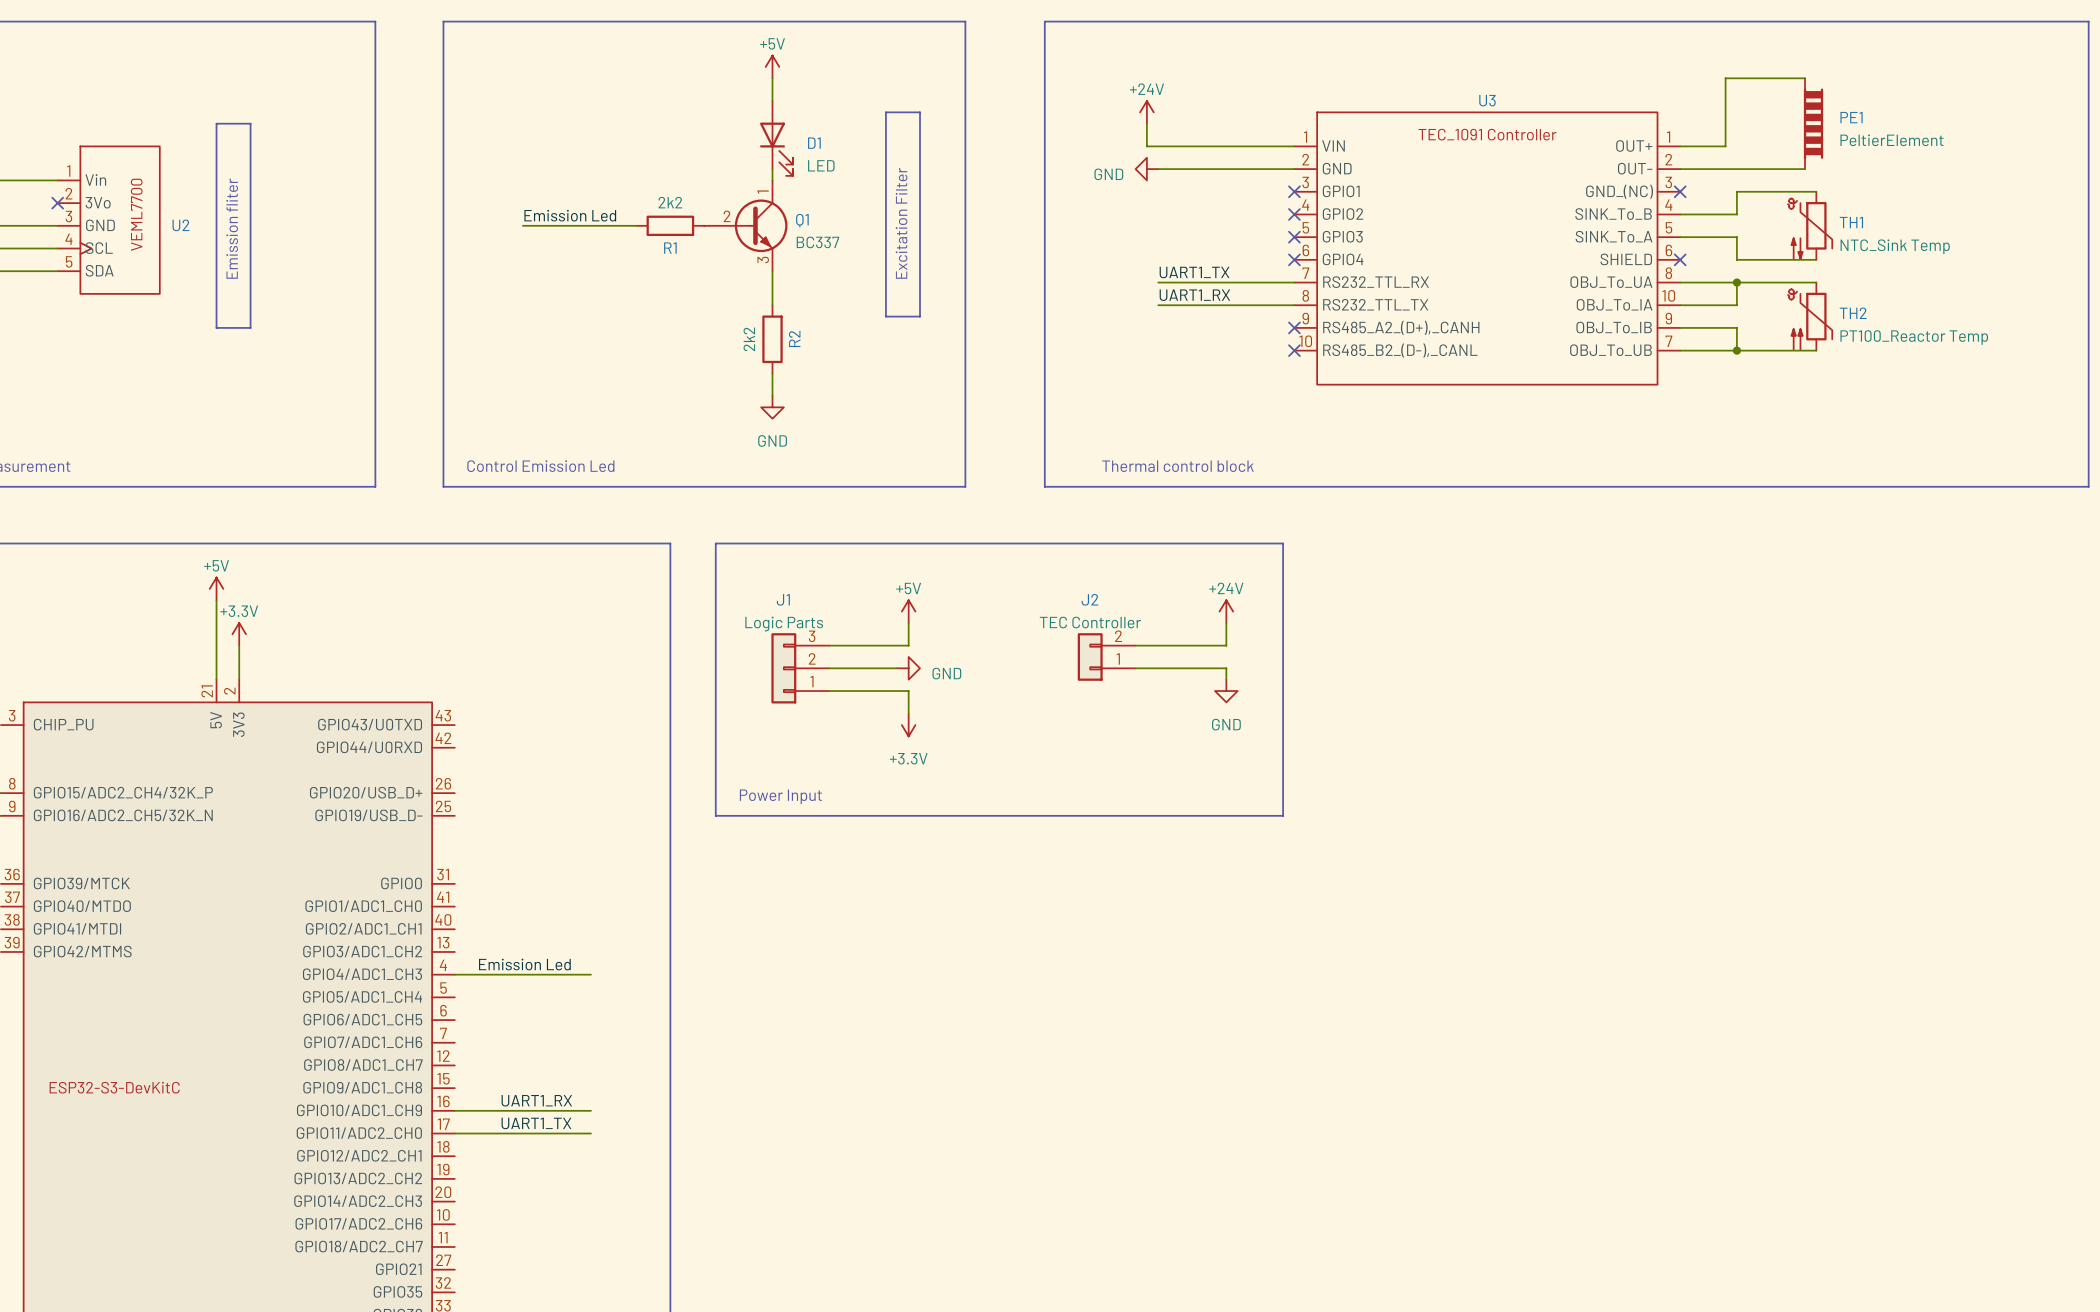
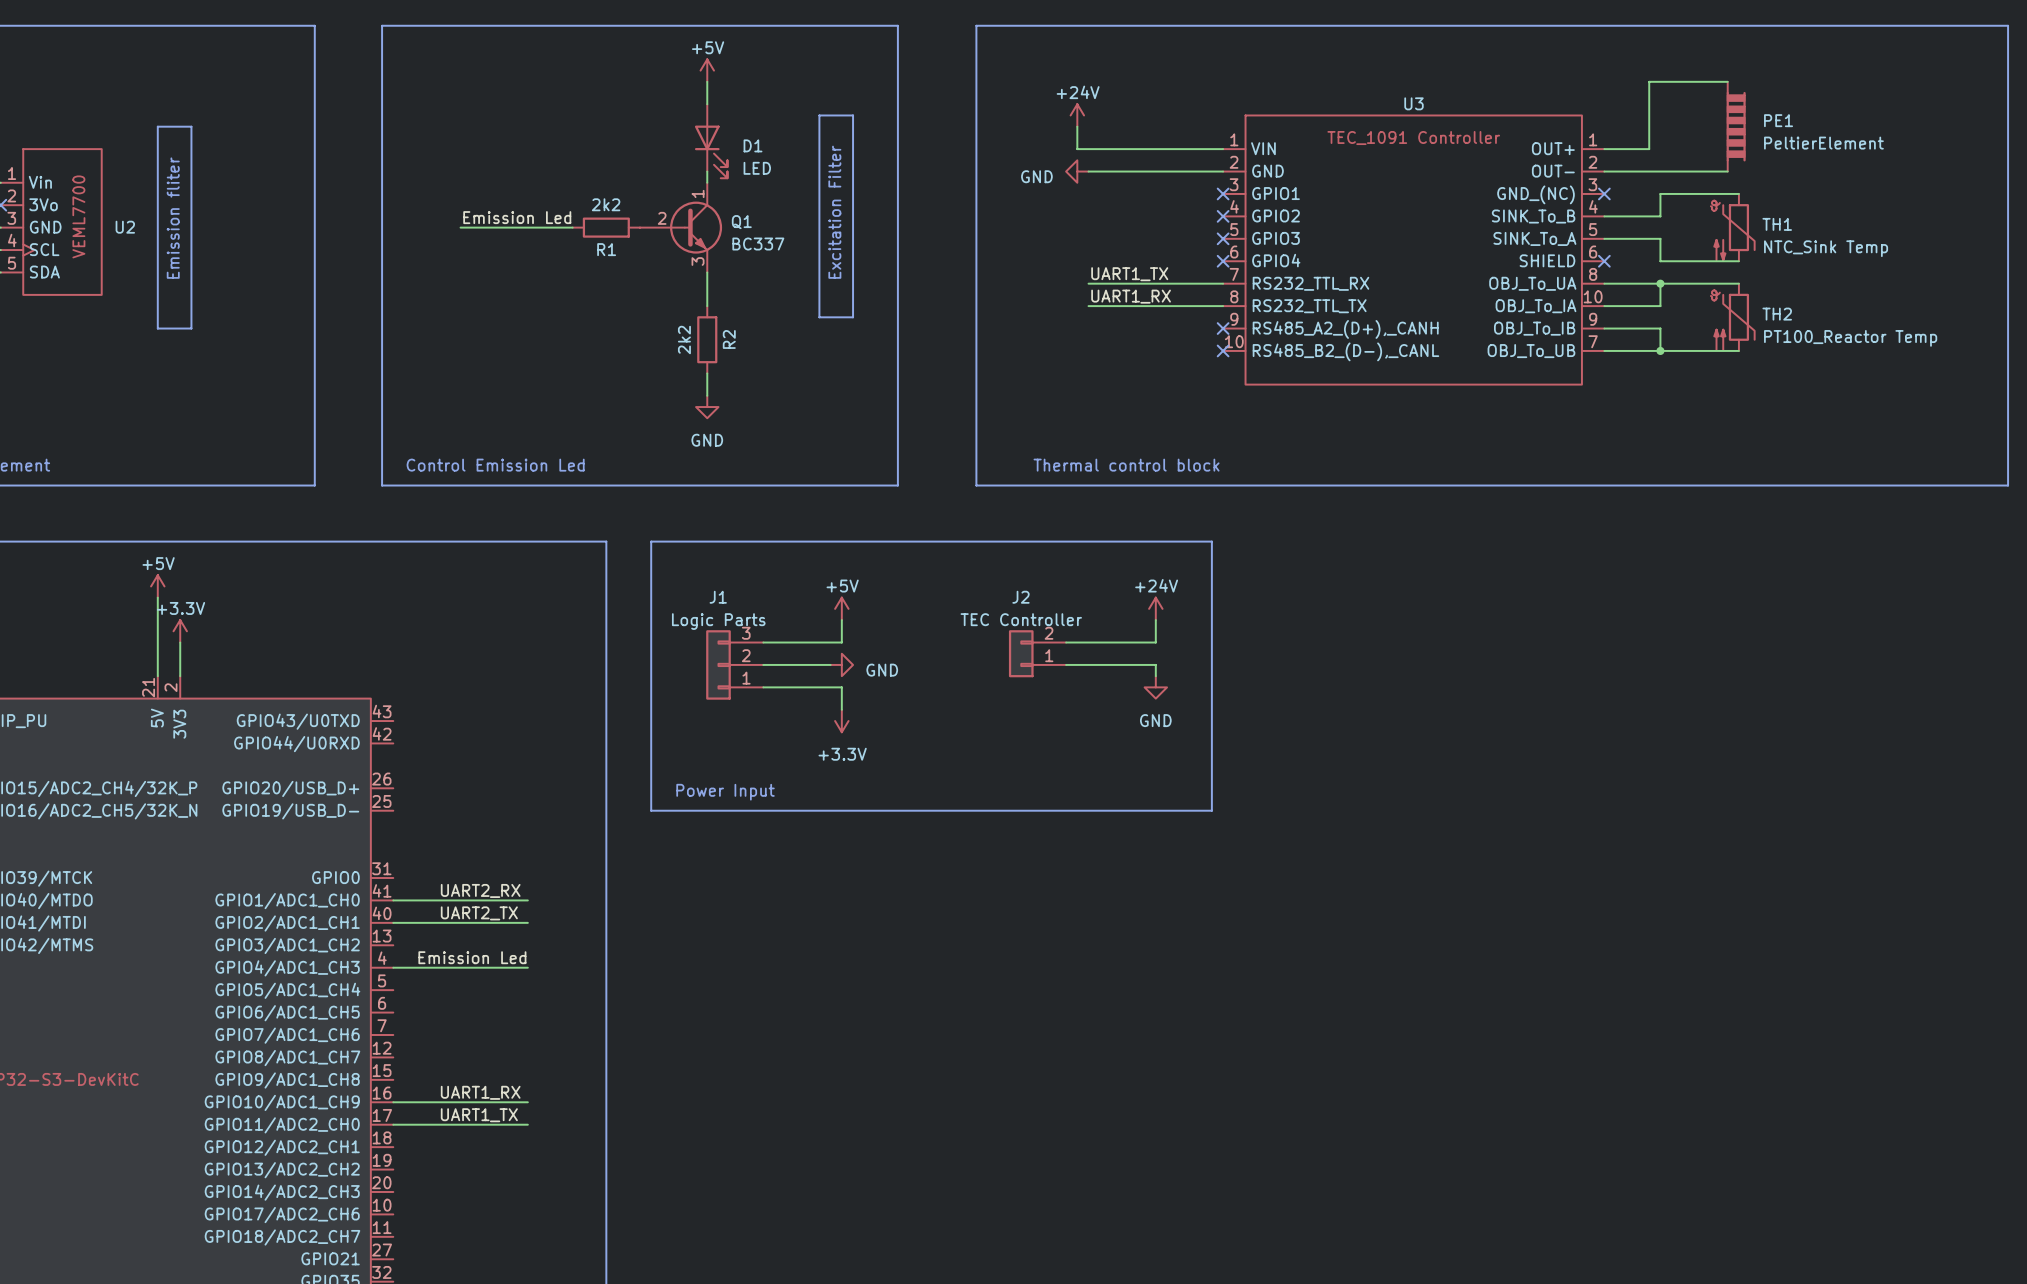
label: none -> UART2_RX (480, 890)
wire: none -> (393, 900) (527, 900)
label: none -> UART2_TX (479, 913)
wire: none -> (393, 922) (527, 922)

